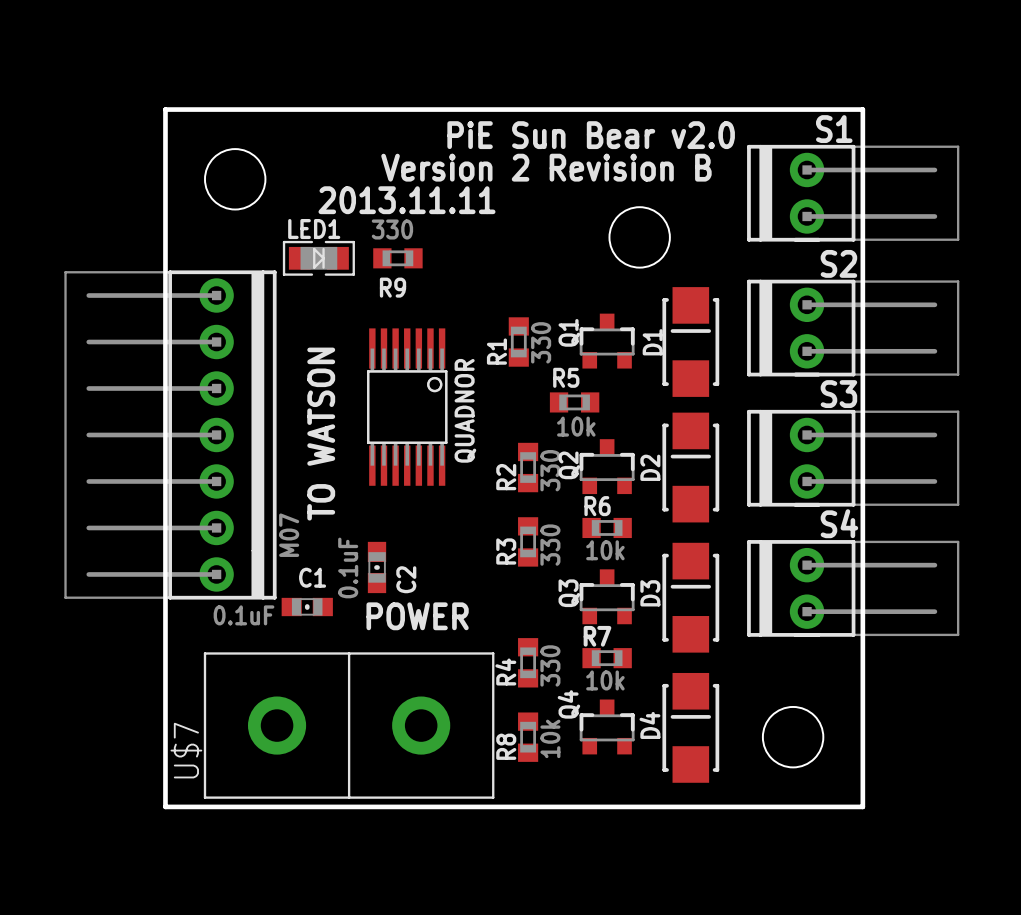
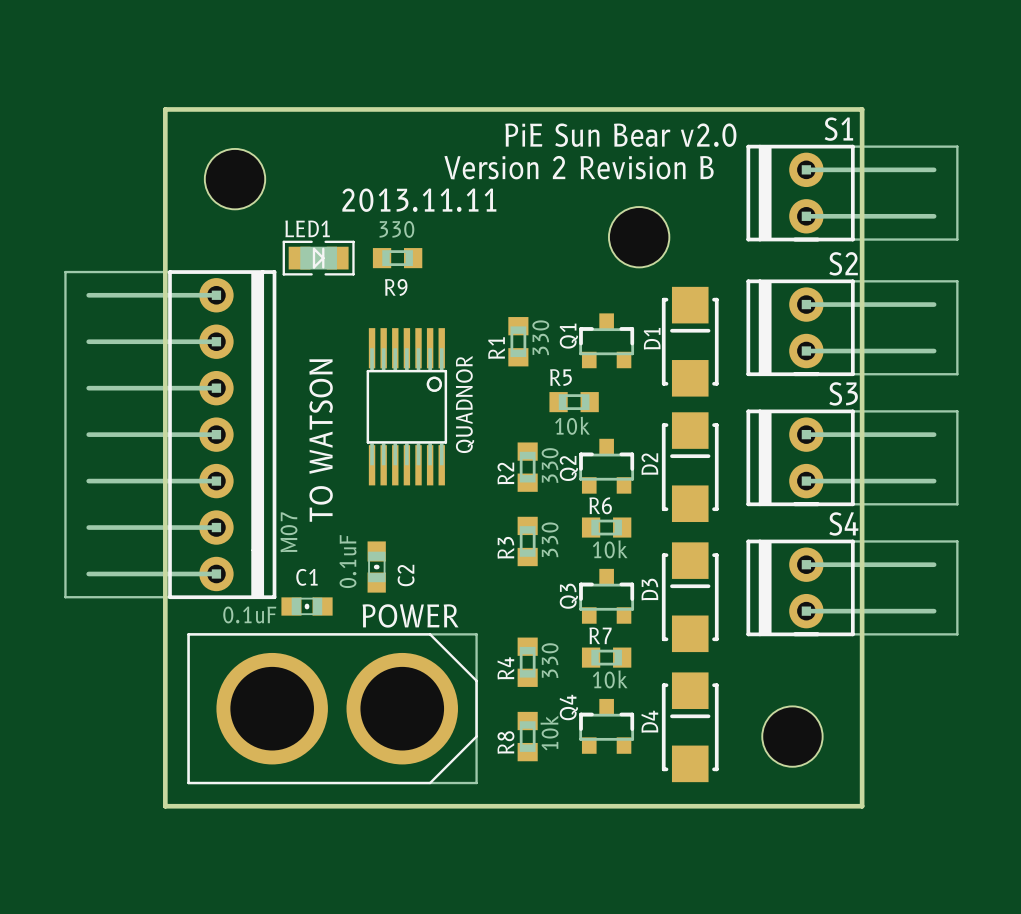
part: none -> (332, 708)
U$7: (349, 725) -> none

